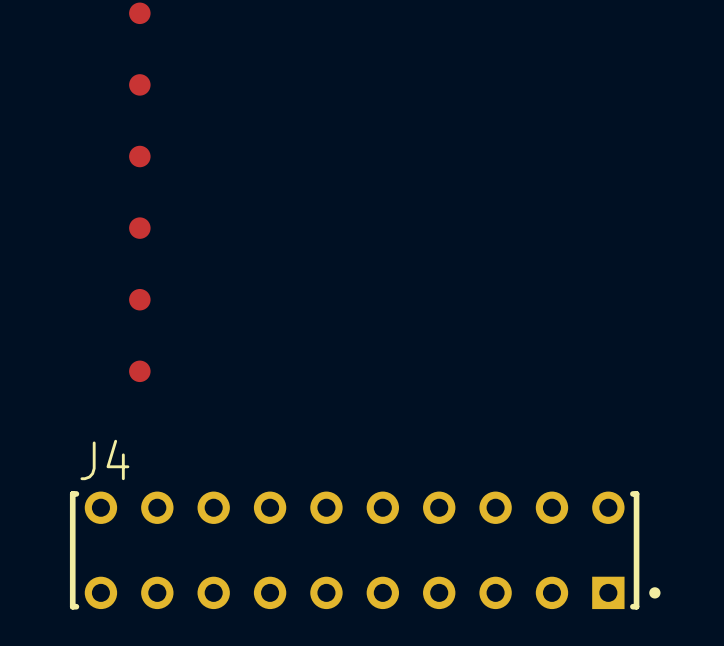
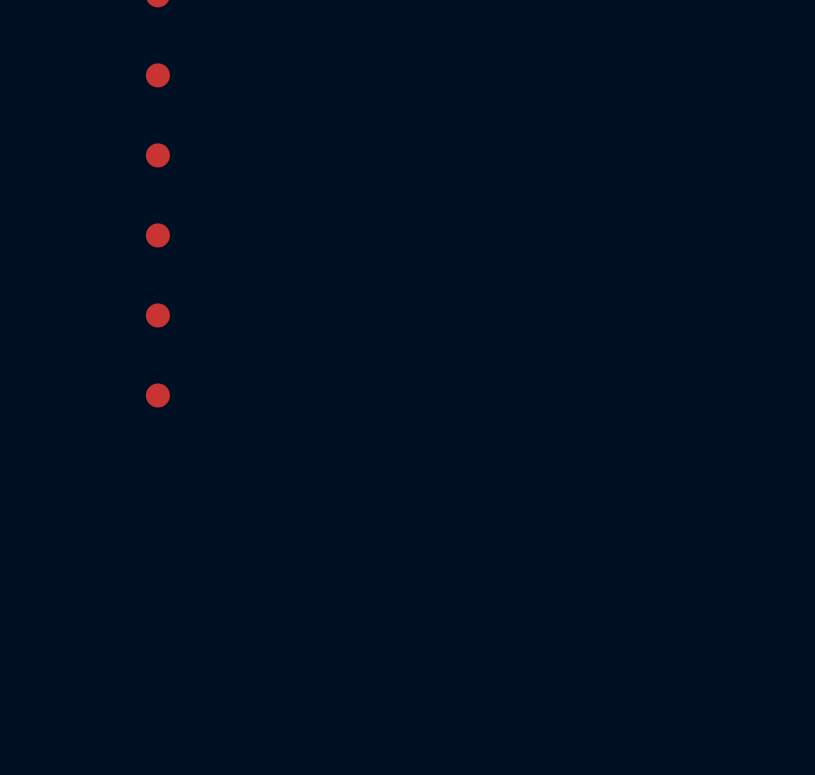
J4: (365, 550) -> none

